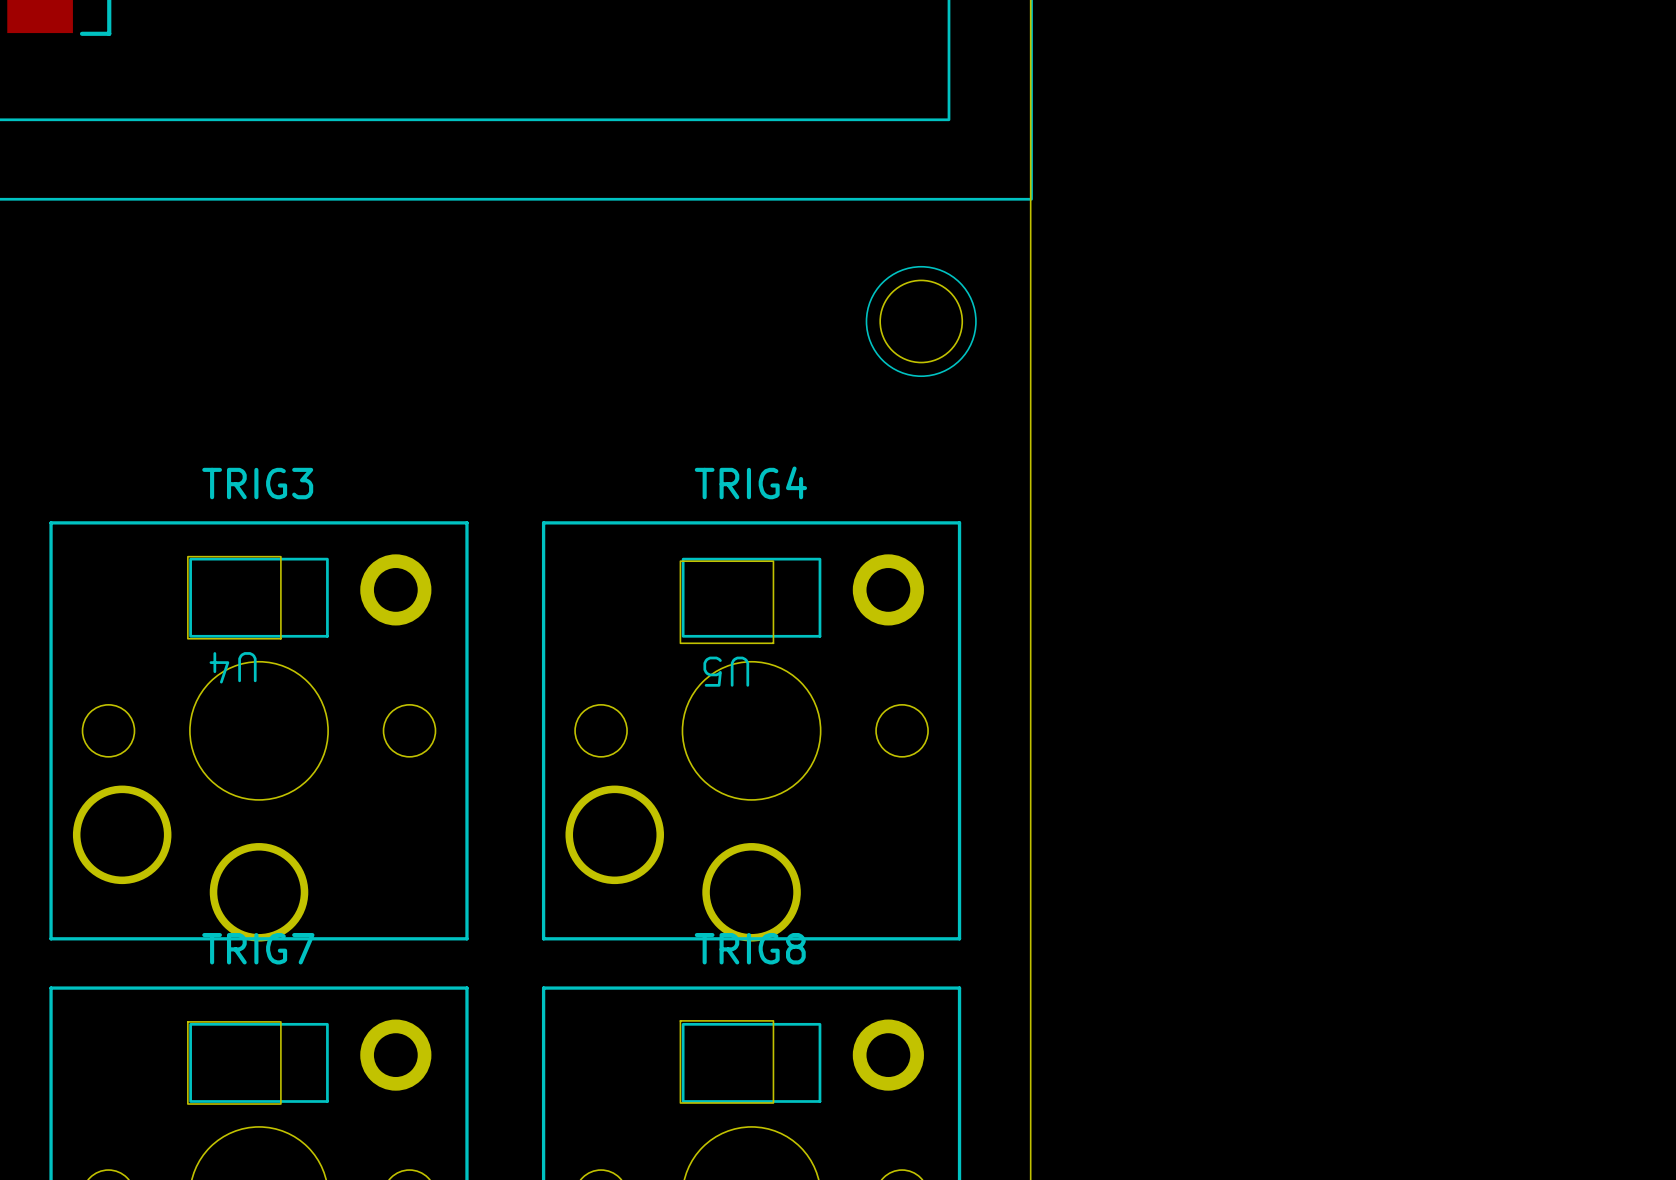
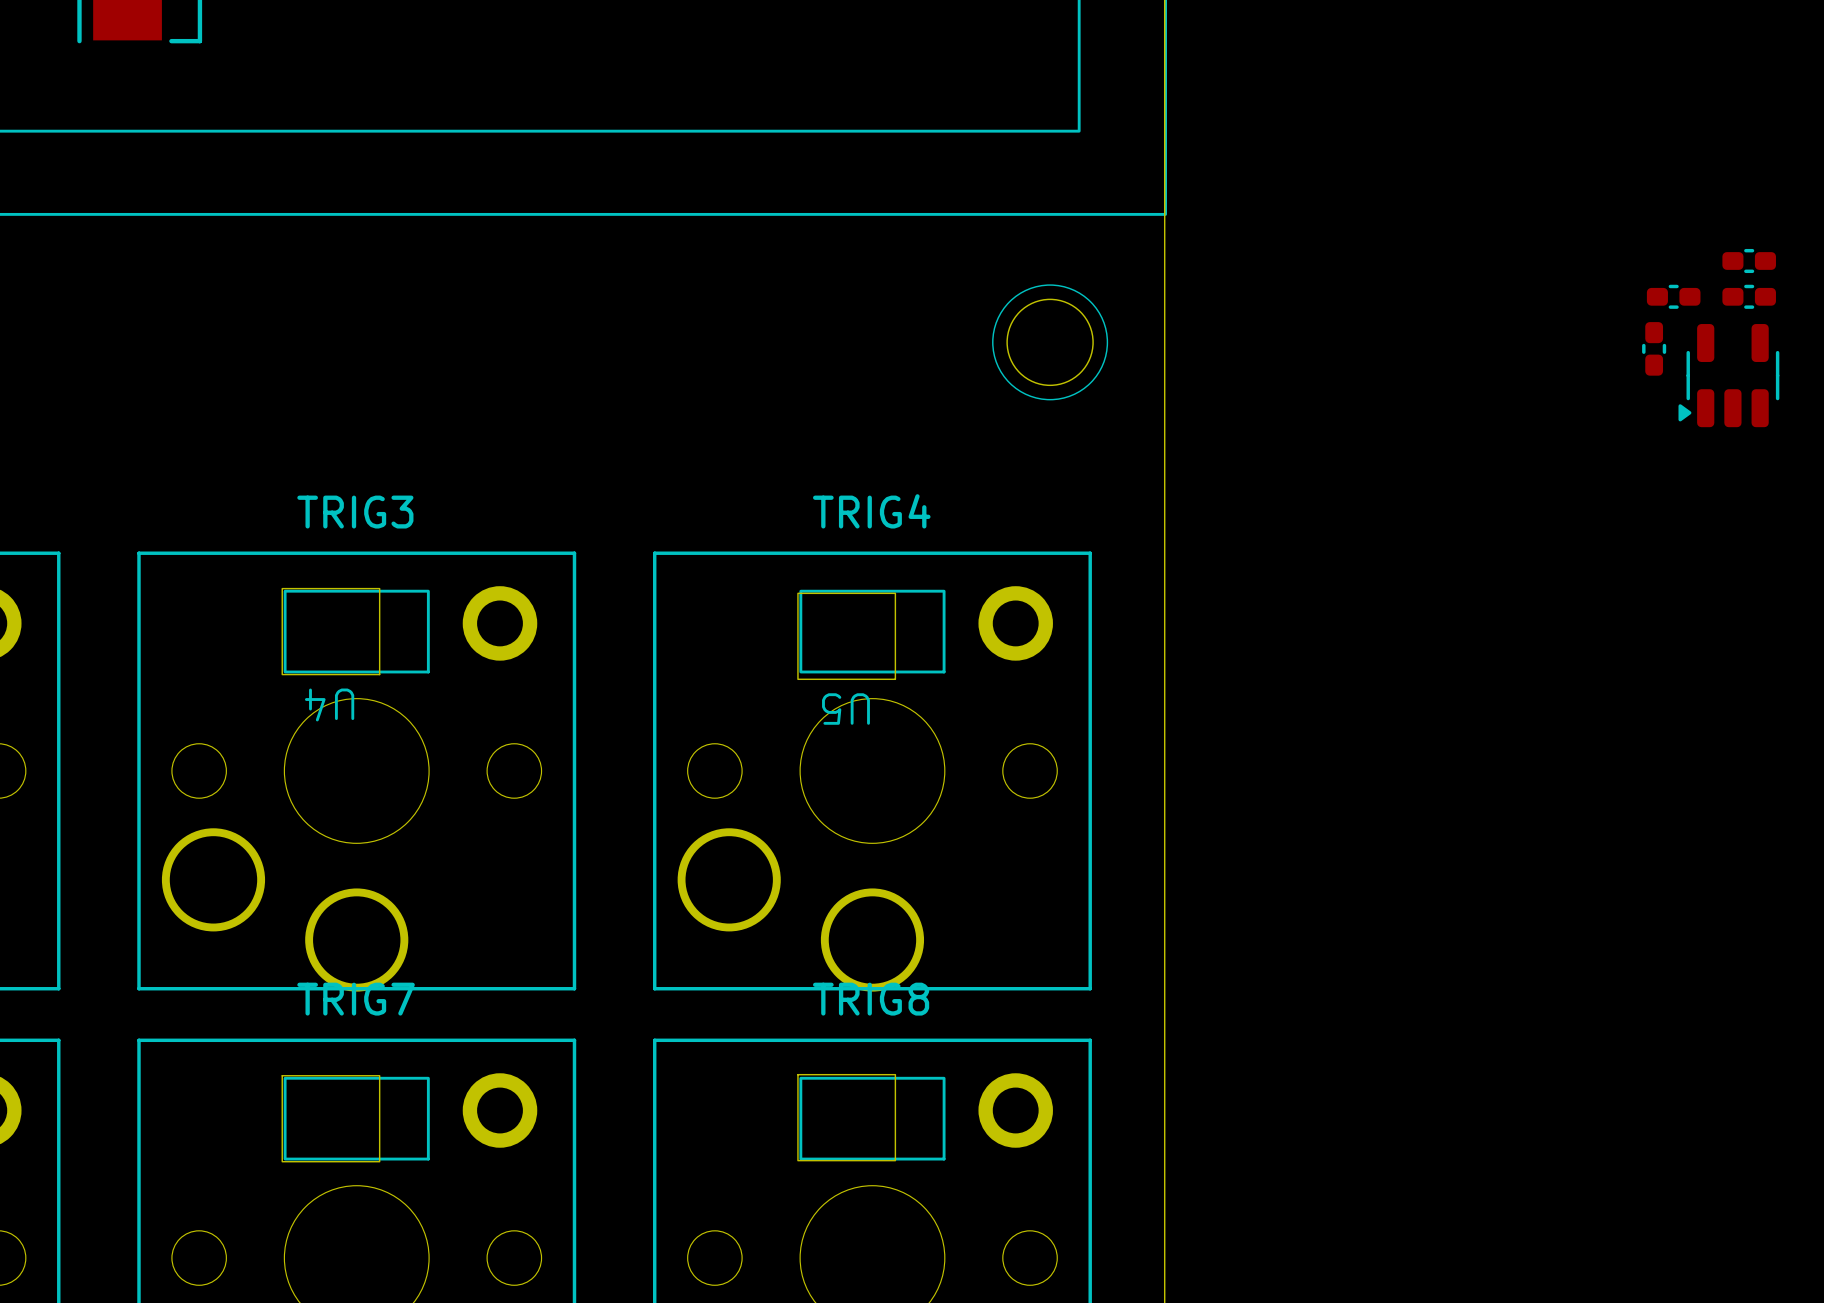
part: none -> (1749, 260)
part: none -> (1673, 296)
part: none -> (1749, 296)
part: none -> (1654, 348)
part: none -> (1728, 375)

